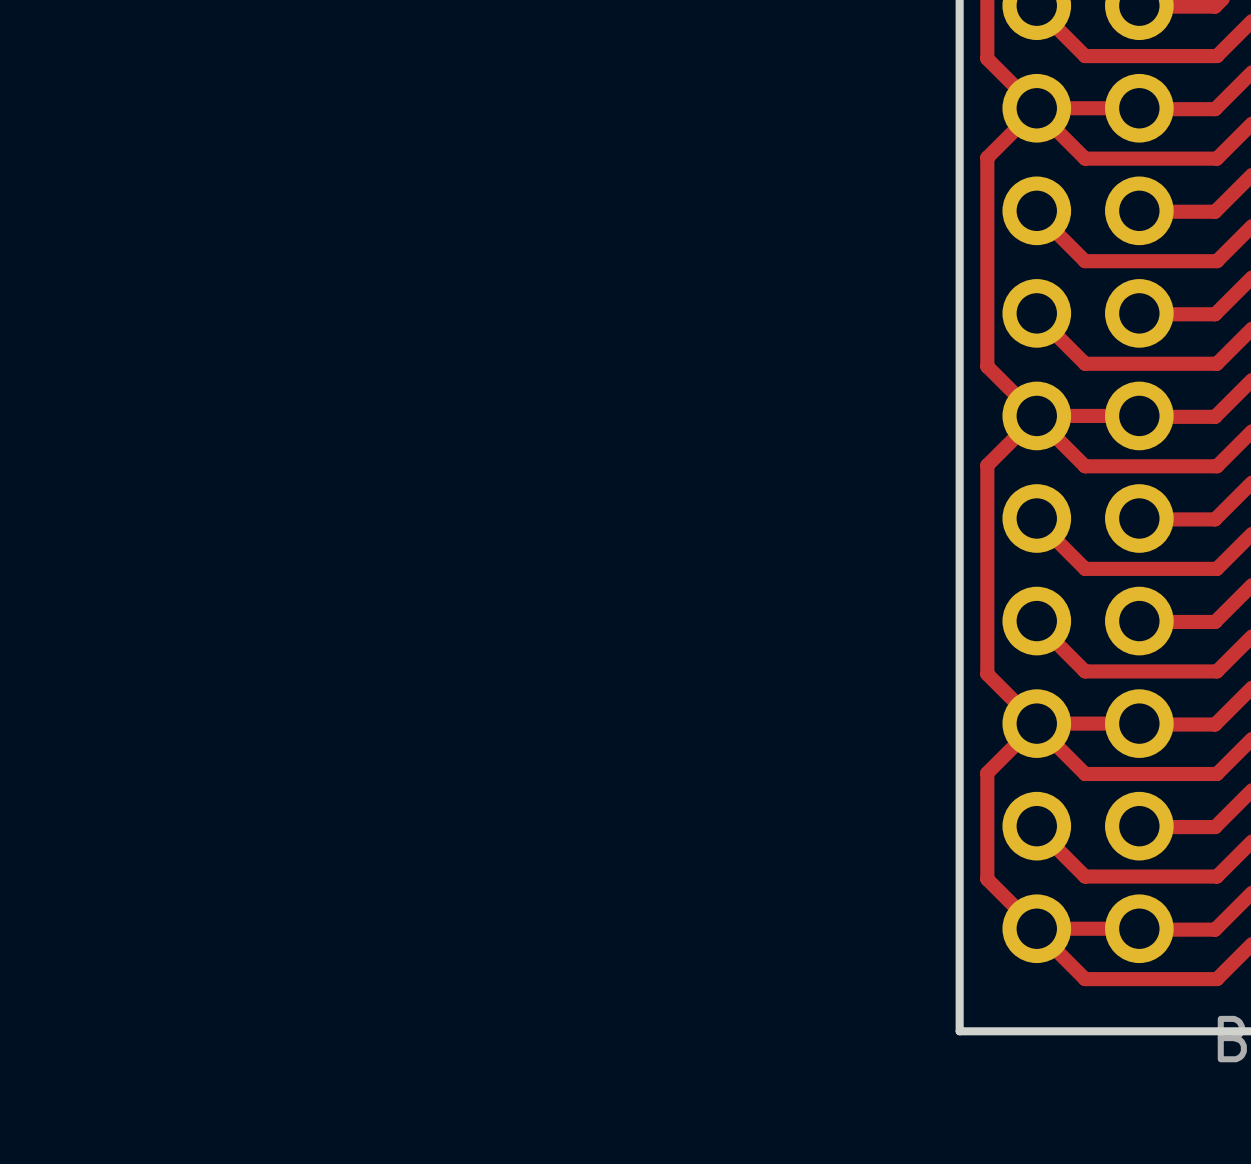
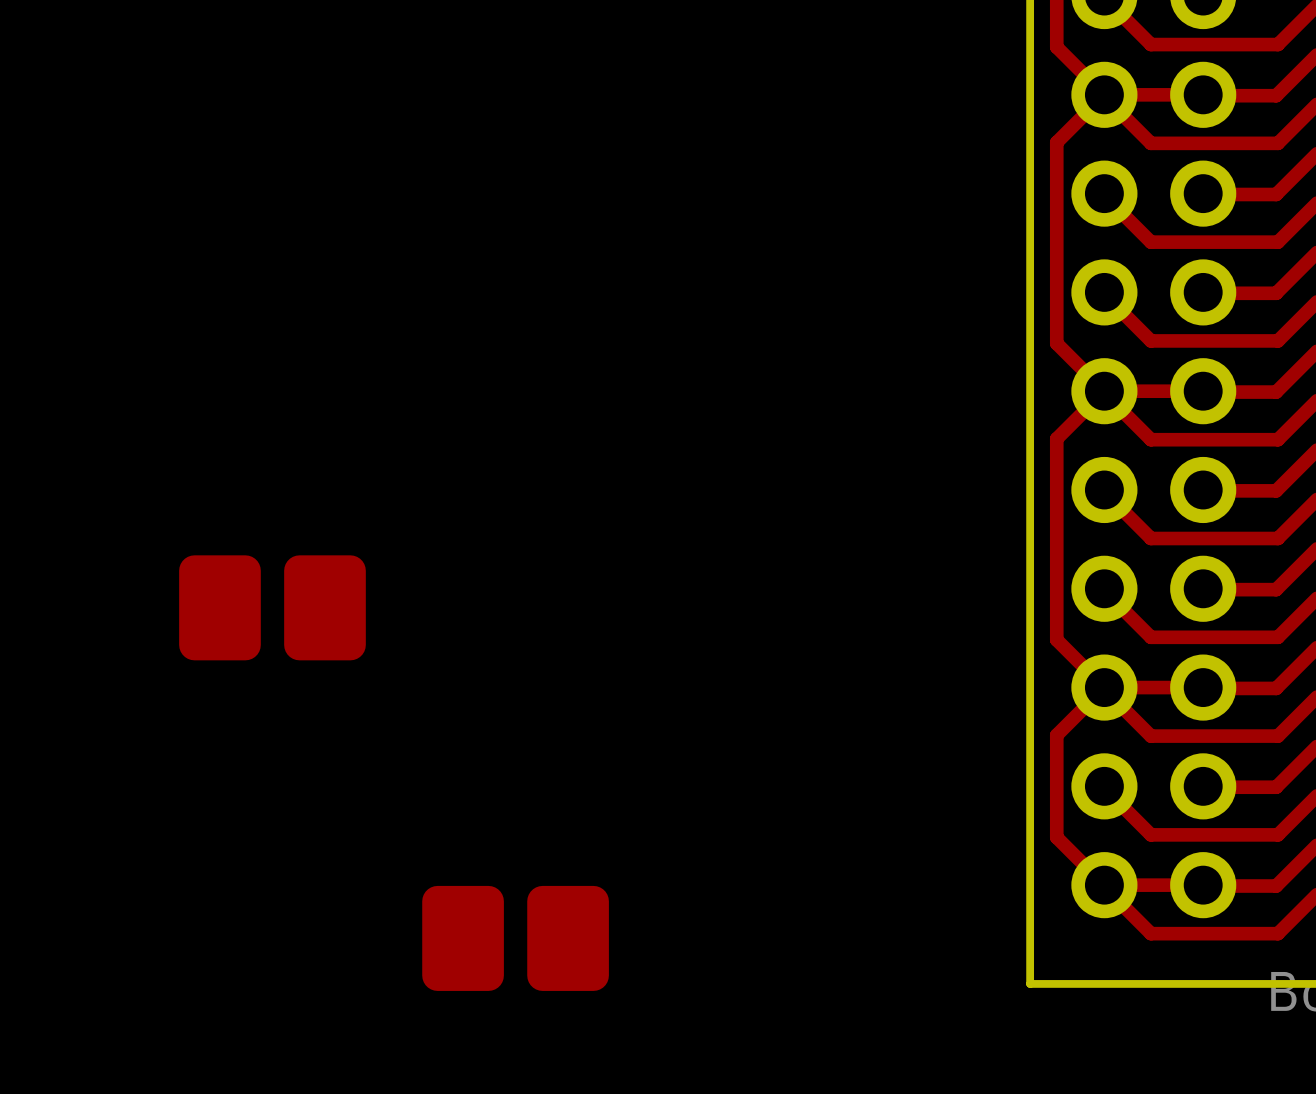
part: none -> (272, 607)
part: none -> (515, 938)

